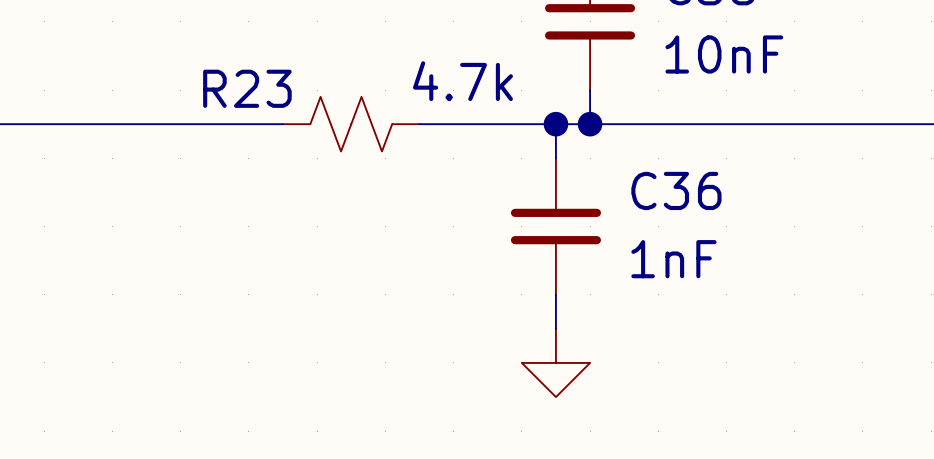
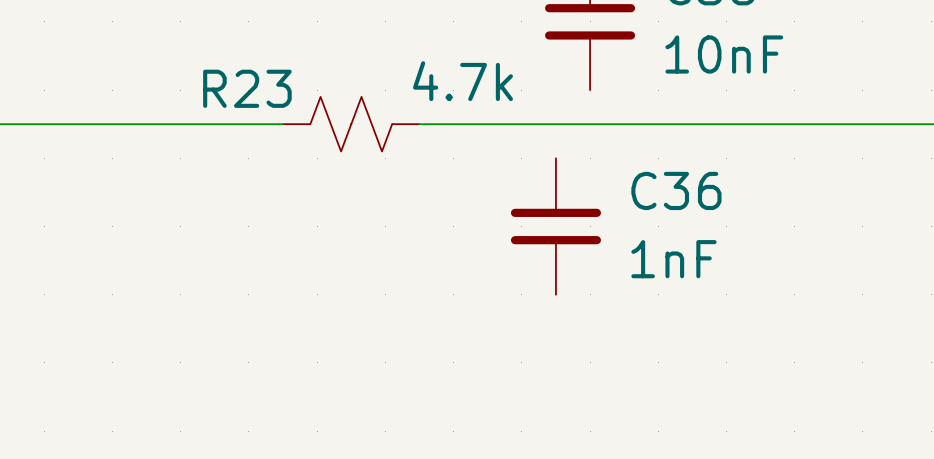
wire: (590, 90) (590, 124) -> none
wire: (555, 124) (555, 158) -> none
junction: (555, 124) -> none
junction: (590, 124) -> none
wire: (555, 294) (555, 328) -> none
power symbol: (555, 362) -> none

